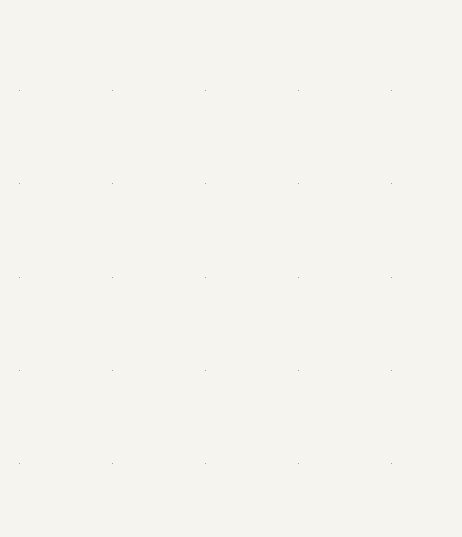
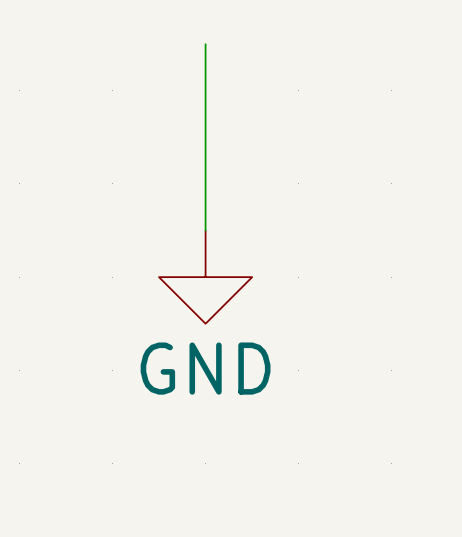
wire: none -> (205, 44) (205, 230)
power symbol: none -> GND (205, 277)

